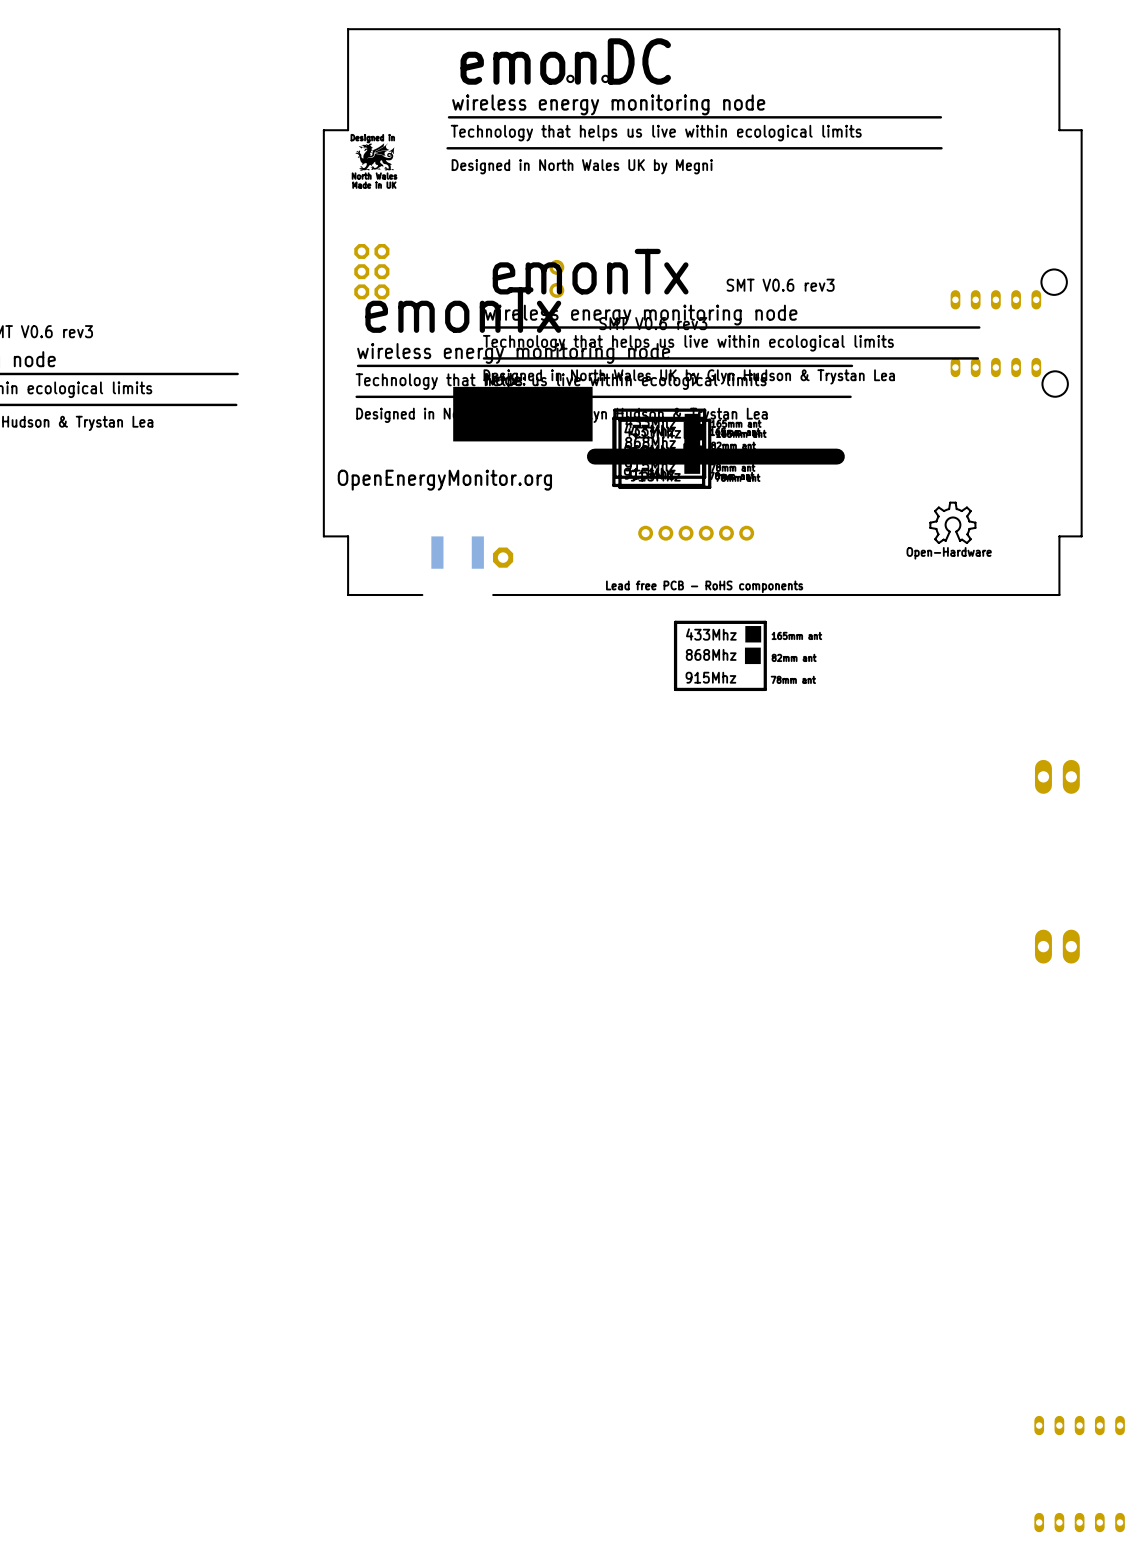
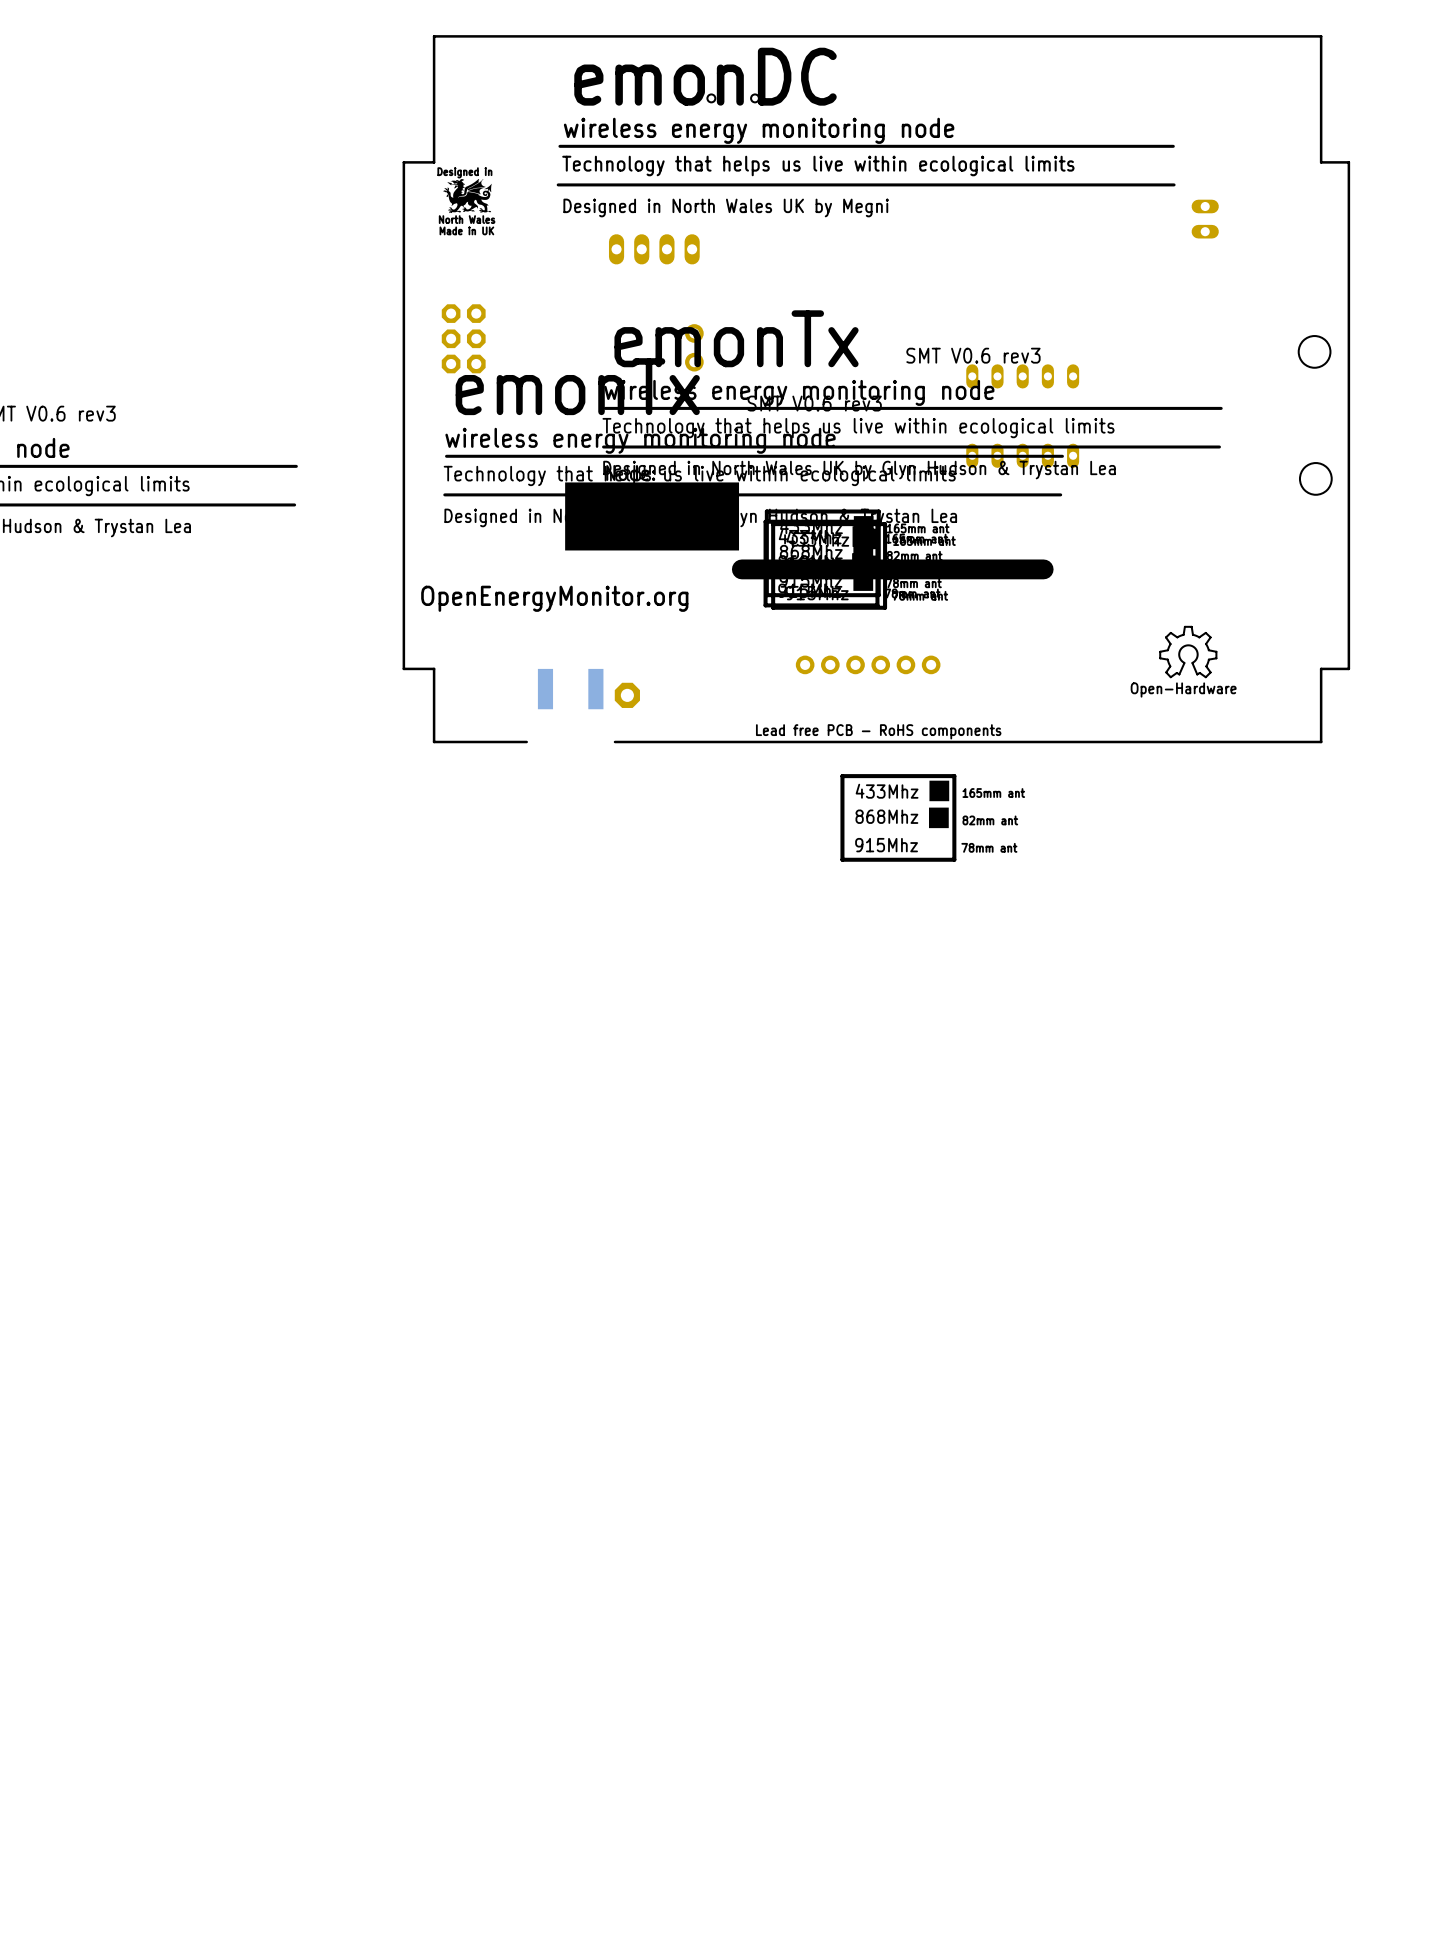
part: none -> (1205, 219)
part: none -> (654, 249)
part: (995, 299) -> none
part: none -> (1022, 376)
part: none -> (1022, 455)
part: (995, 367) -> none
part: (1057, 776) -> none
part: (1057, 946) -> none
part: (1079, 1425) -> none
part: (1079, 1522) -> none

